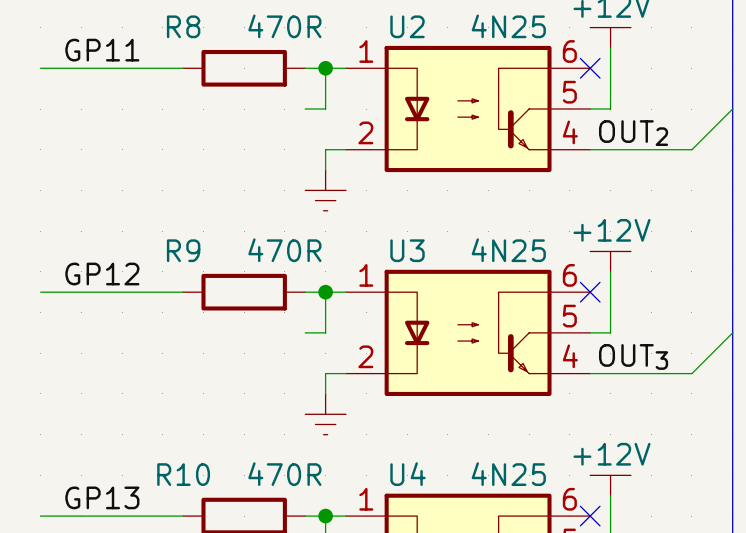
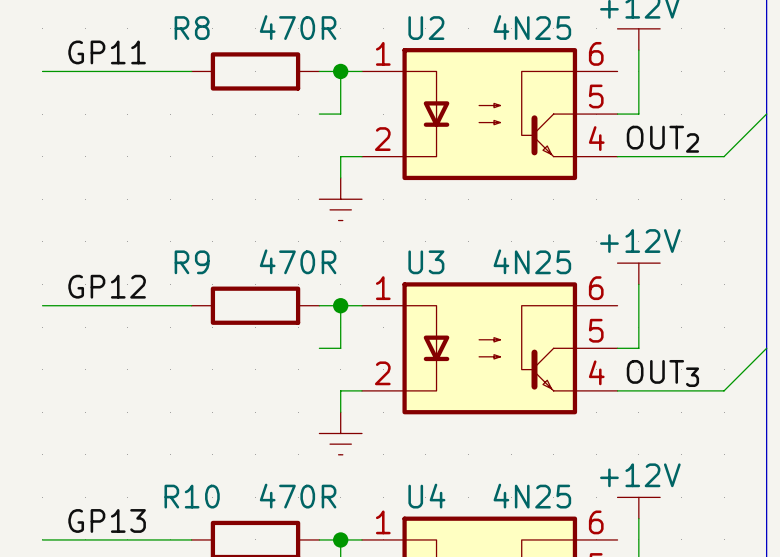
no-connect mark: (590, 68) -> none
no-connect mark: (590, 292) -> none
no-connect mark: (590, 516) -> none

